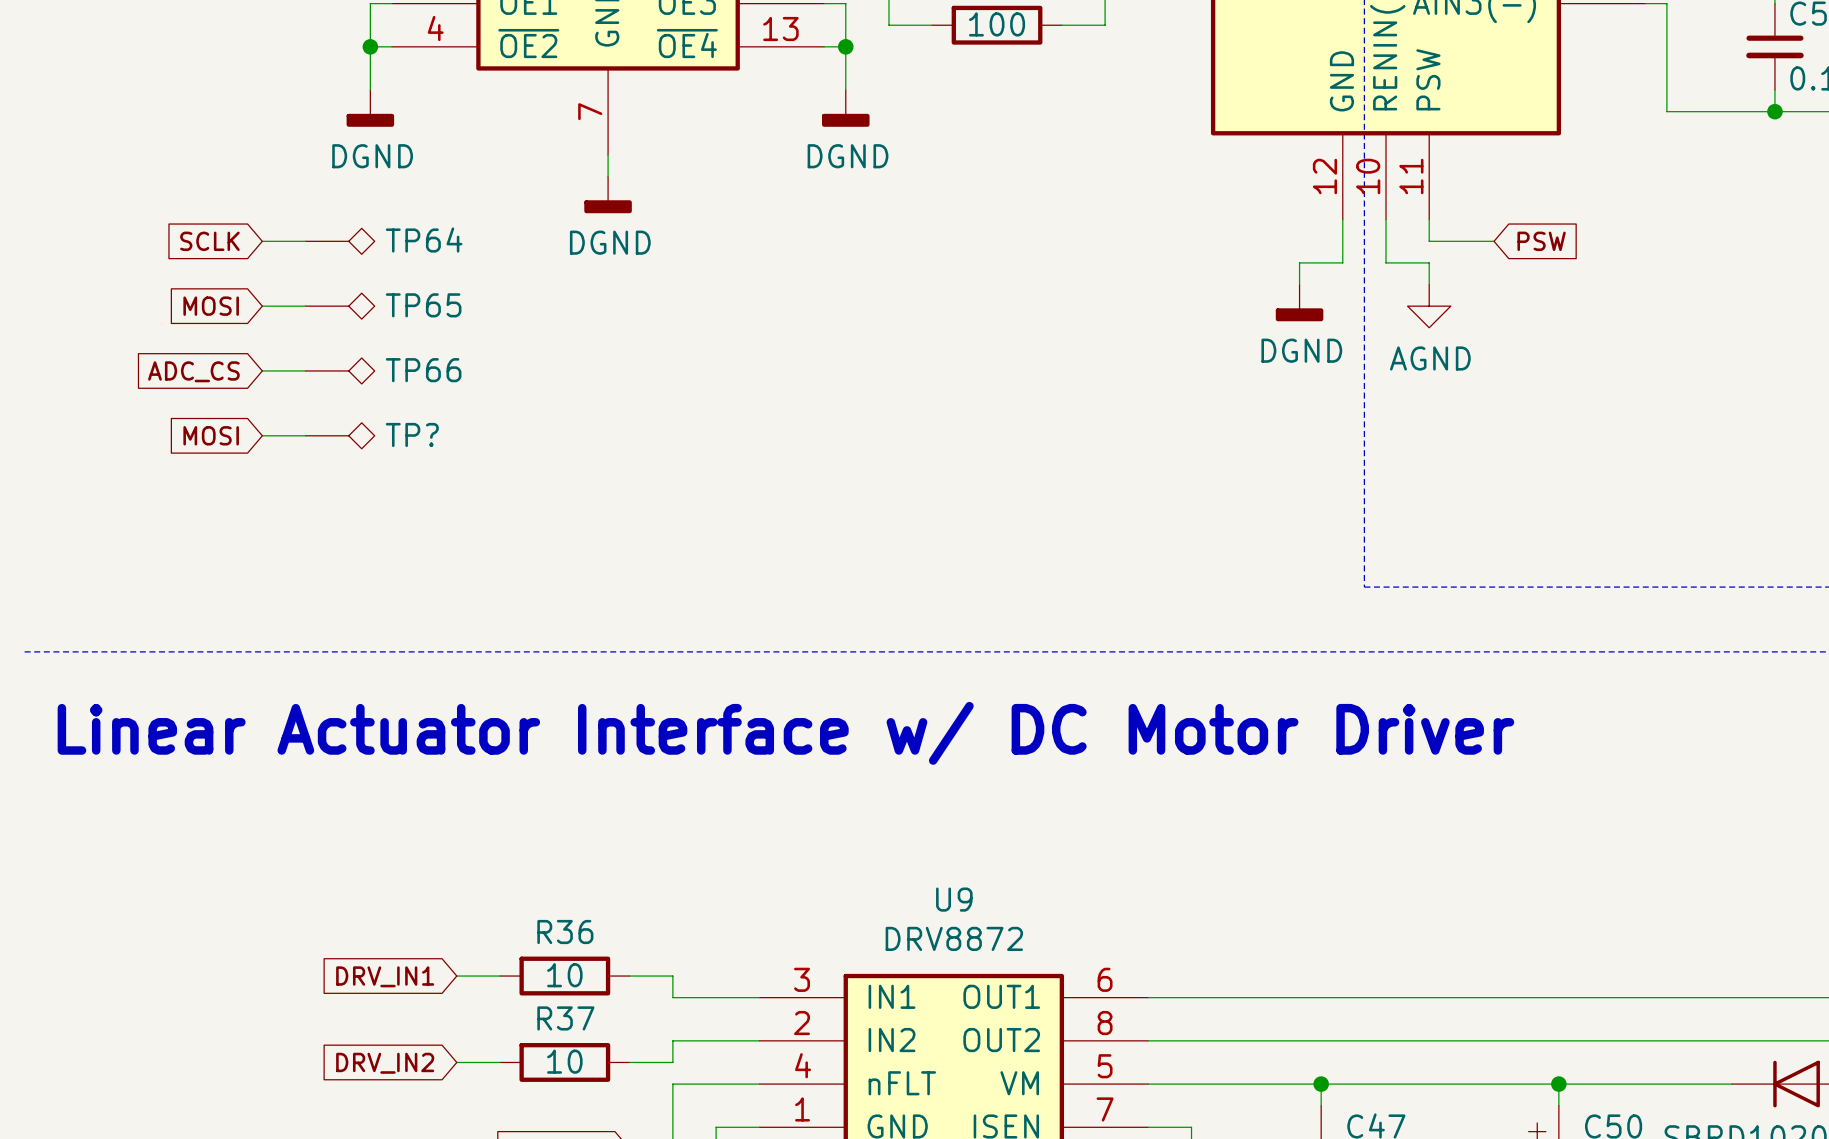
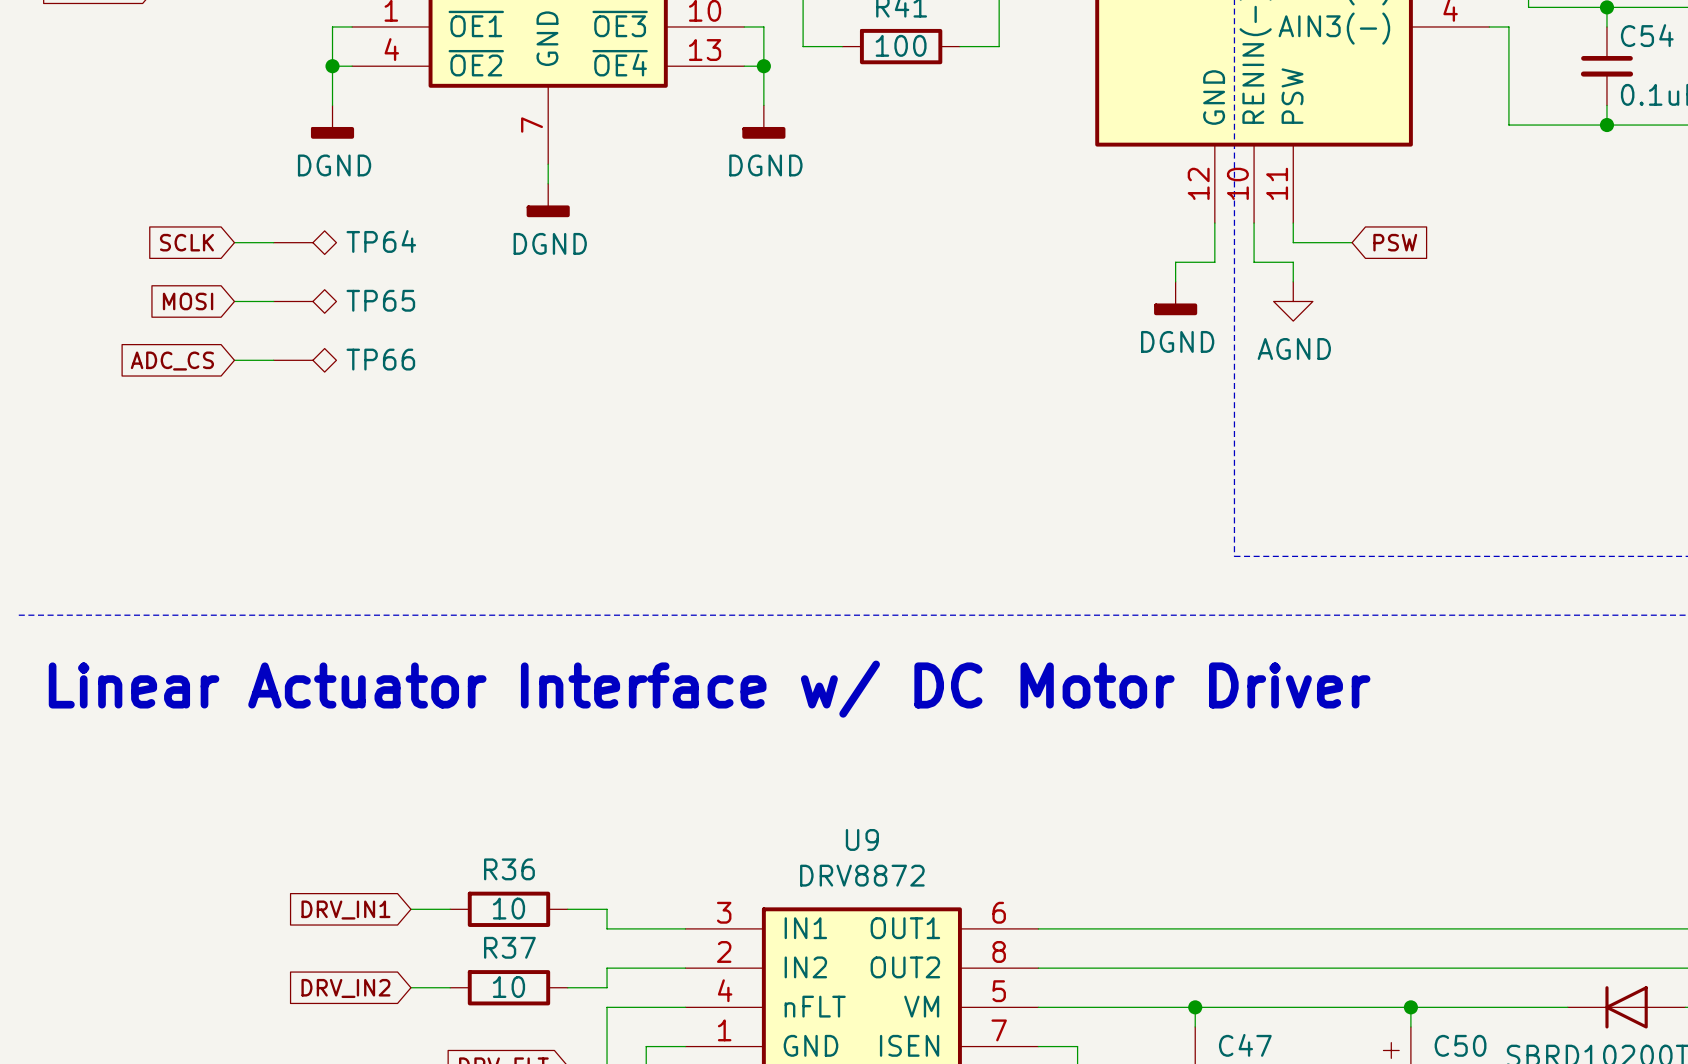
global label: MOSI (211, 435) -> none
wire: (262, 435) (305, 435) -> none
TP?: (340, 435) -> none

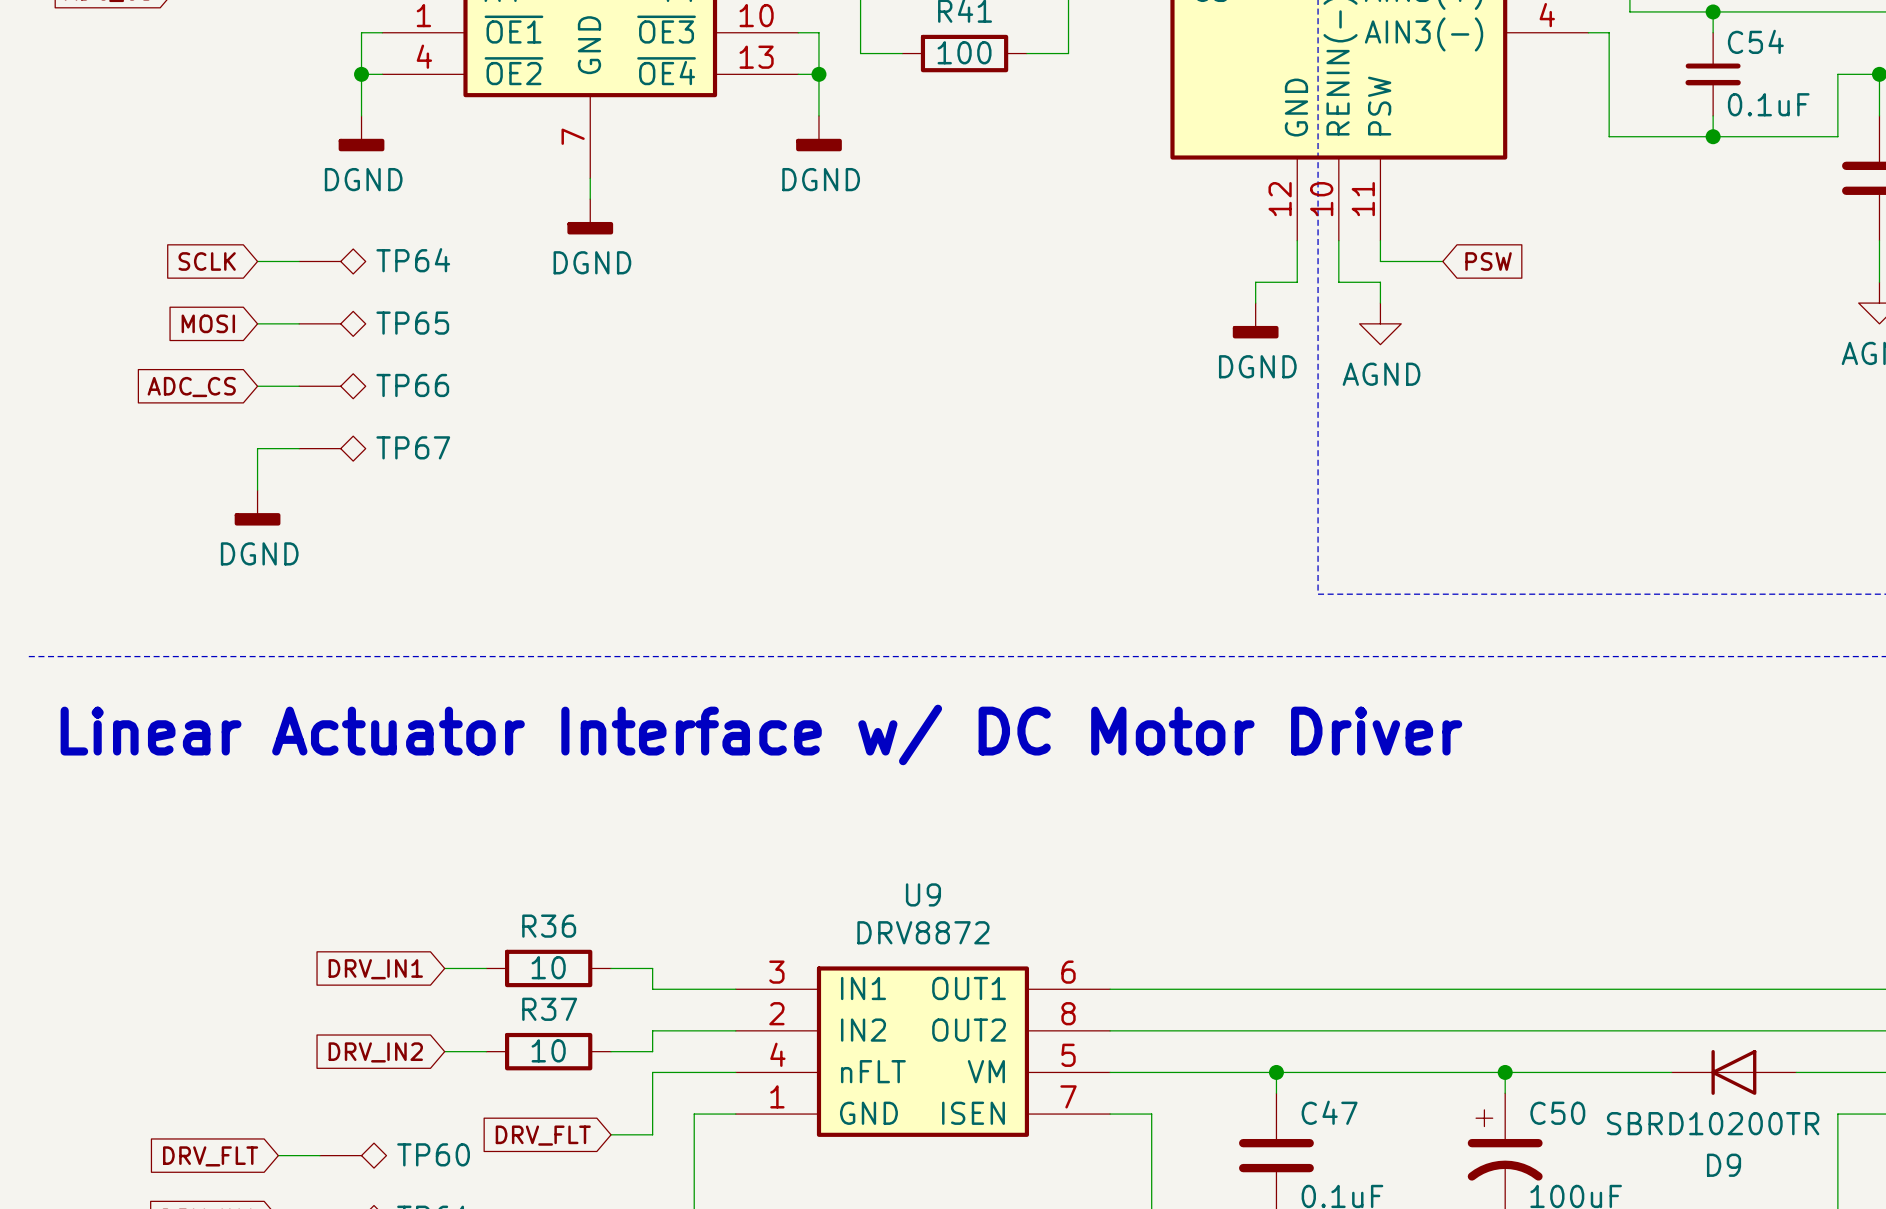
wire: none -> (299, 448) (257, 448) (257, 490)
TP67: none -> (332, 448)
power symbol: none -> DGND (257, 507)

